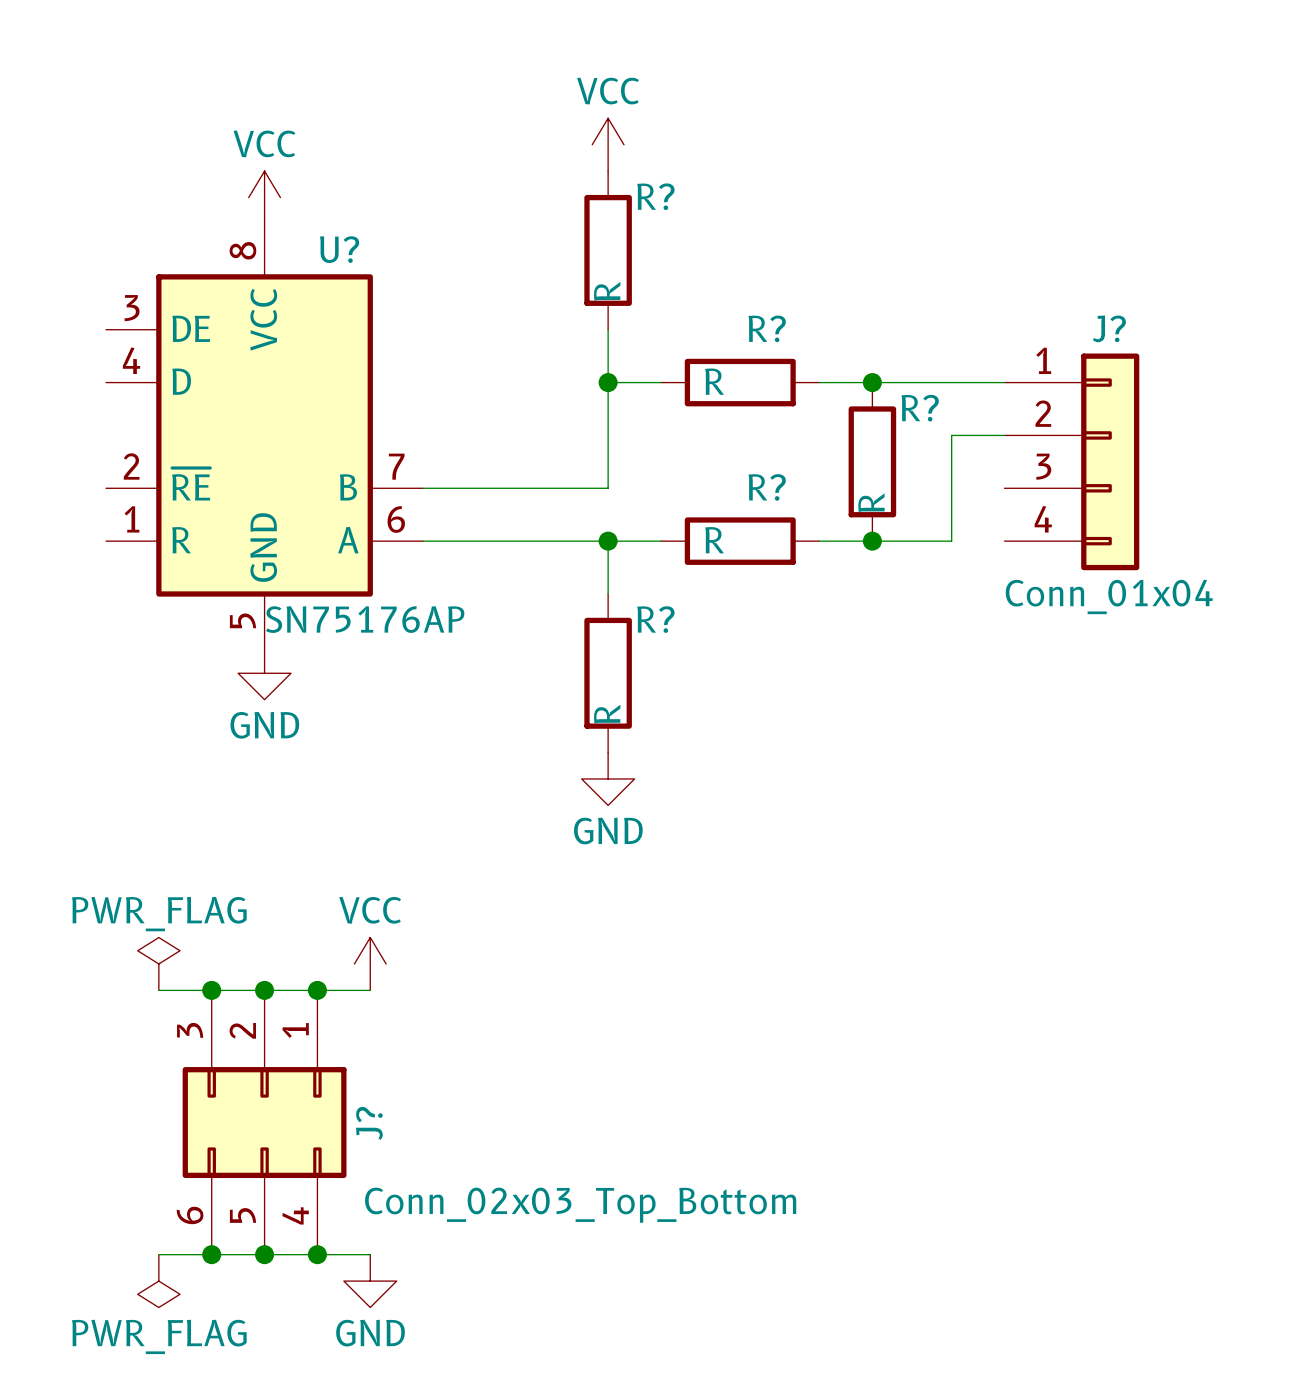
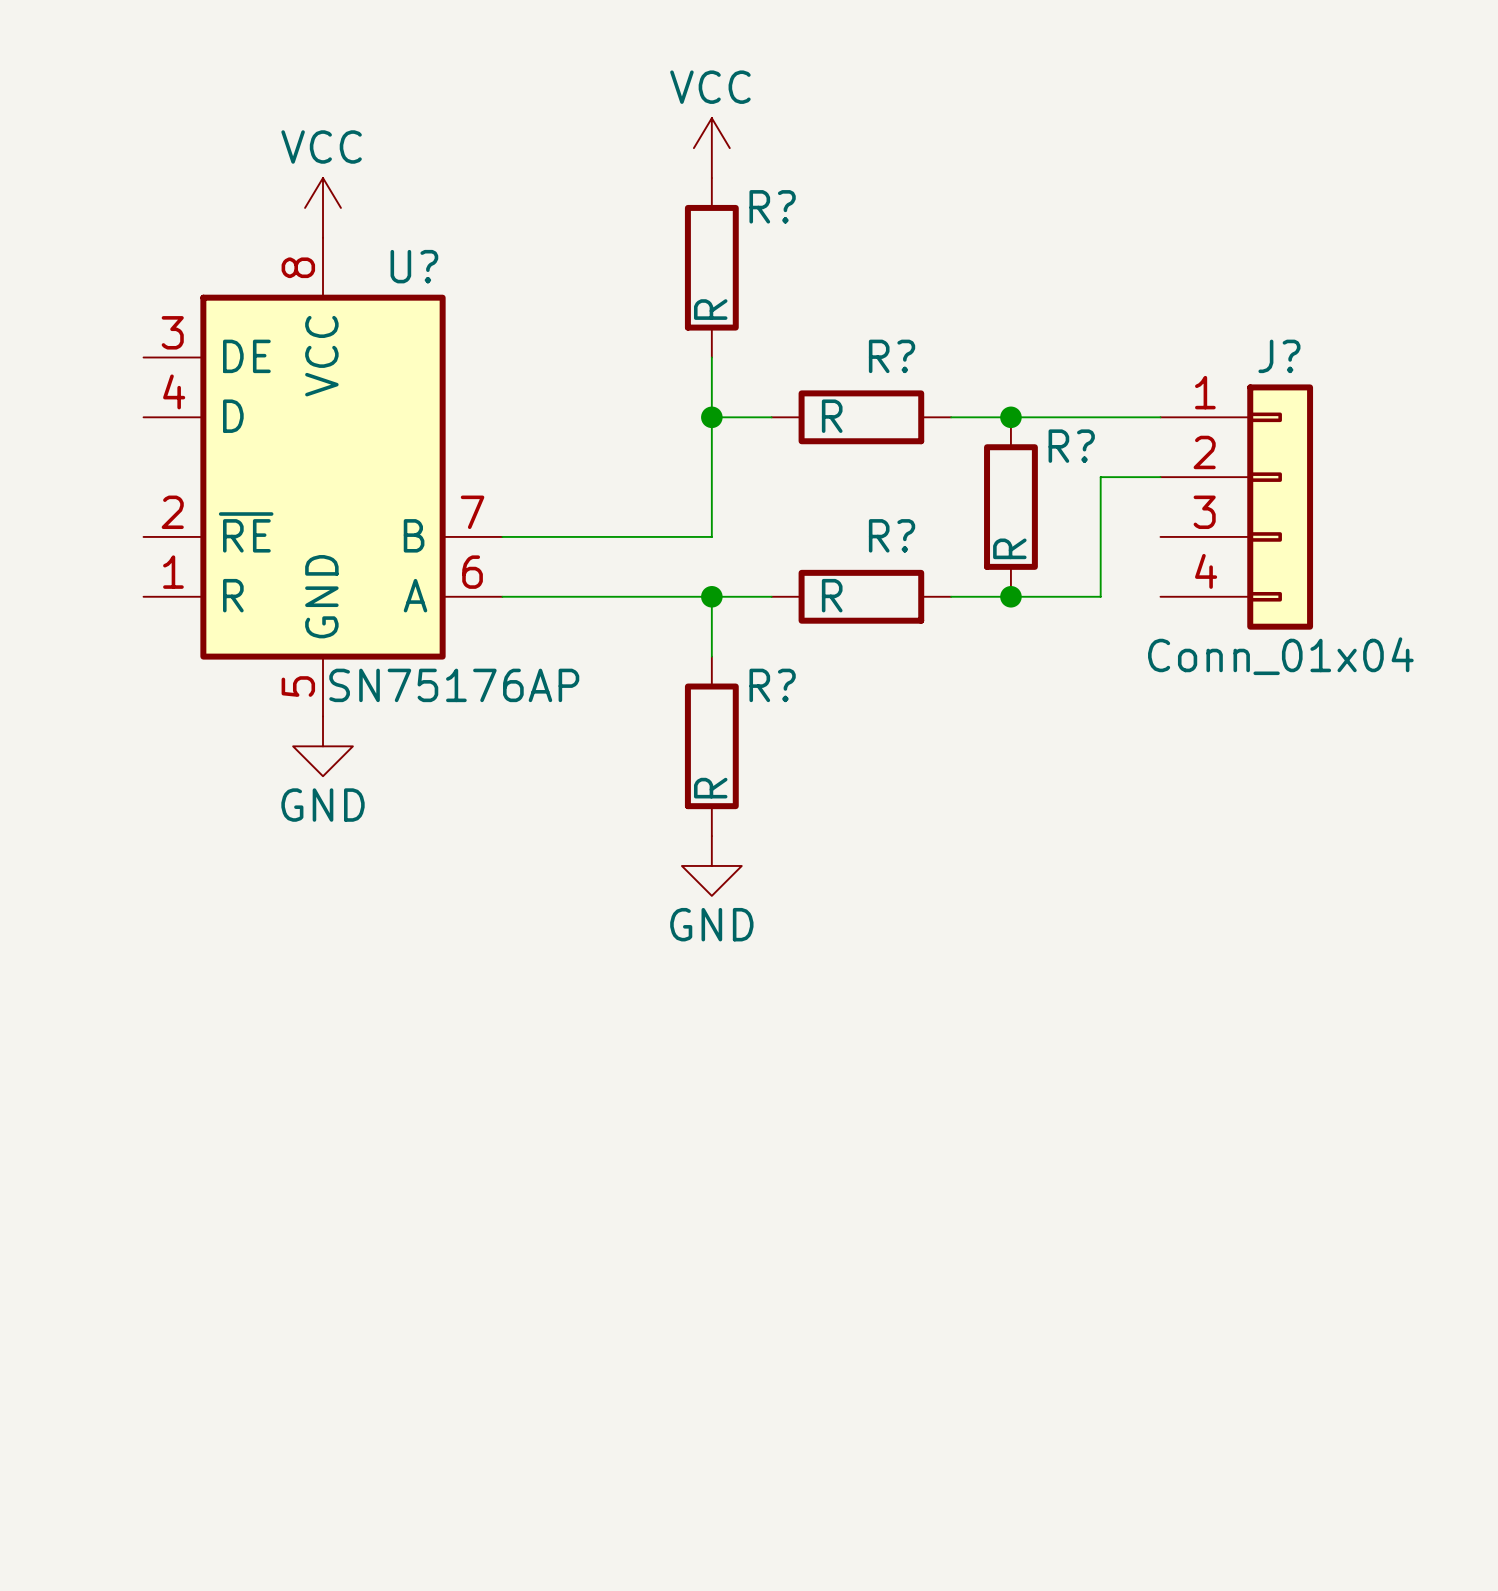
power symbol: PWR_FLAG (158, 963) -> none
power symbol: VCC (370, 963) -> none
wire: (158, 990) (370, 990) -> none
junction: (211, 990) -> none
junction: (264, 990) -> none
junction: (317, 990) -> none
J?: Conn_02x03_Top_Bottom (264, 1122) -> none
wire: (158, 1254) (370, 1254) -> none
junction: (211, 1254) -> none
junction: (264, 1254) -> none
junction: (317, 1254) -> none
power symbol: PWR_FLAG (158, 1281) -> none
power symbol: GND (370, 1281) -> none

